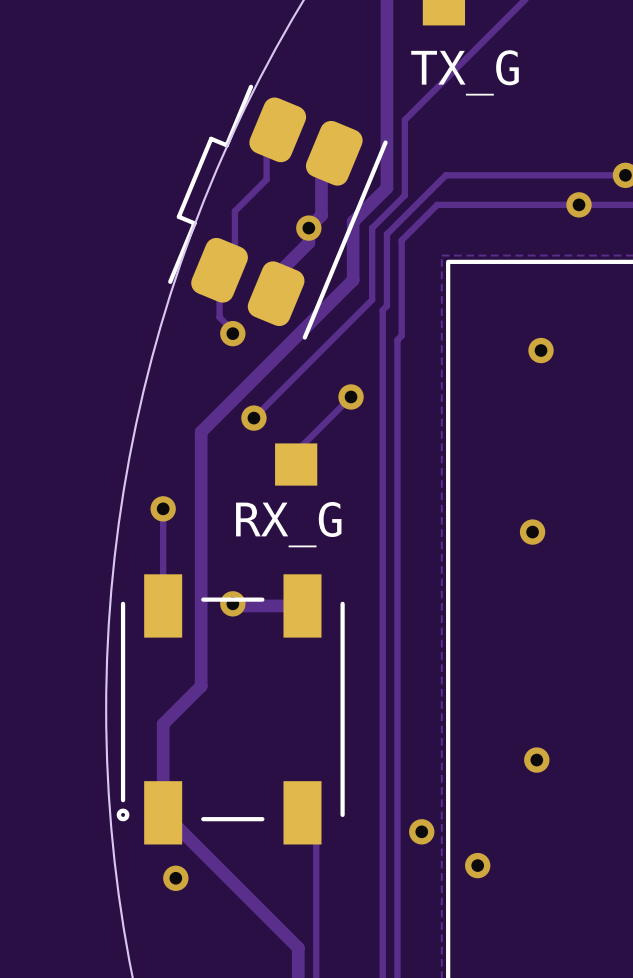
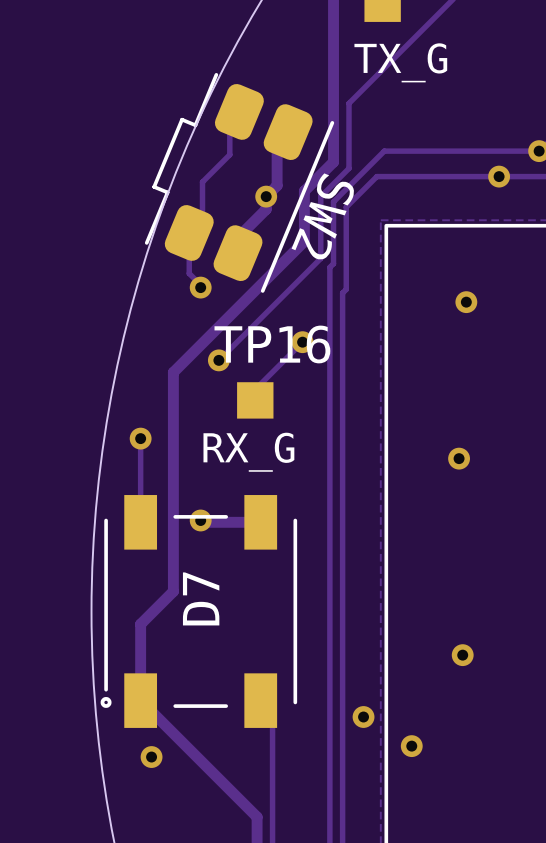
SW2 name: none -> SW2 (323, 216)
TP16 name: none -> TP16 (272, 344)
D7 name: none -> D7 (201, 598)

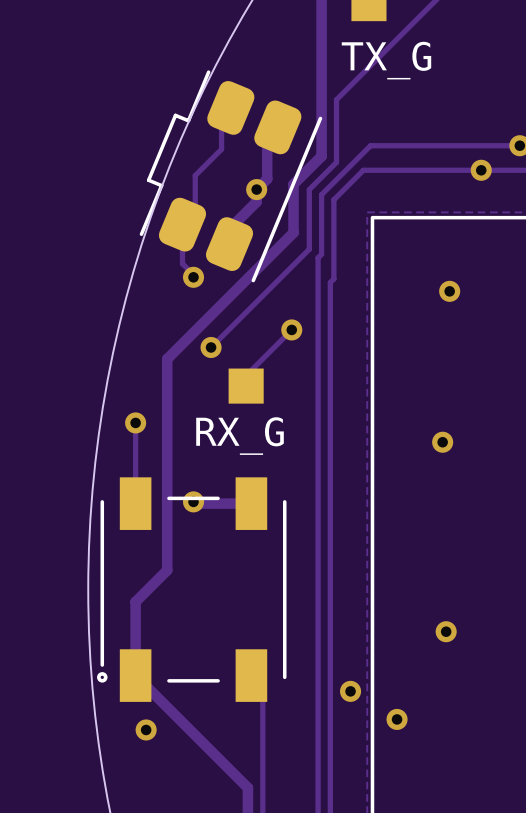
SW2 name: SW2 (323, 216) -> none
TP16 name: TP16 (272, 344) -> none
D7 name: D7 (201, 598) -> none

